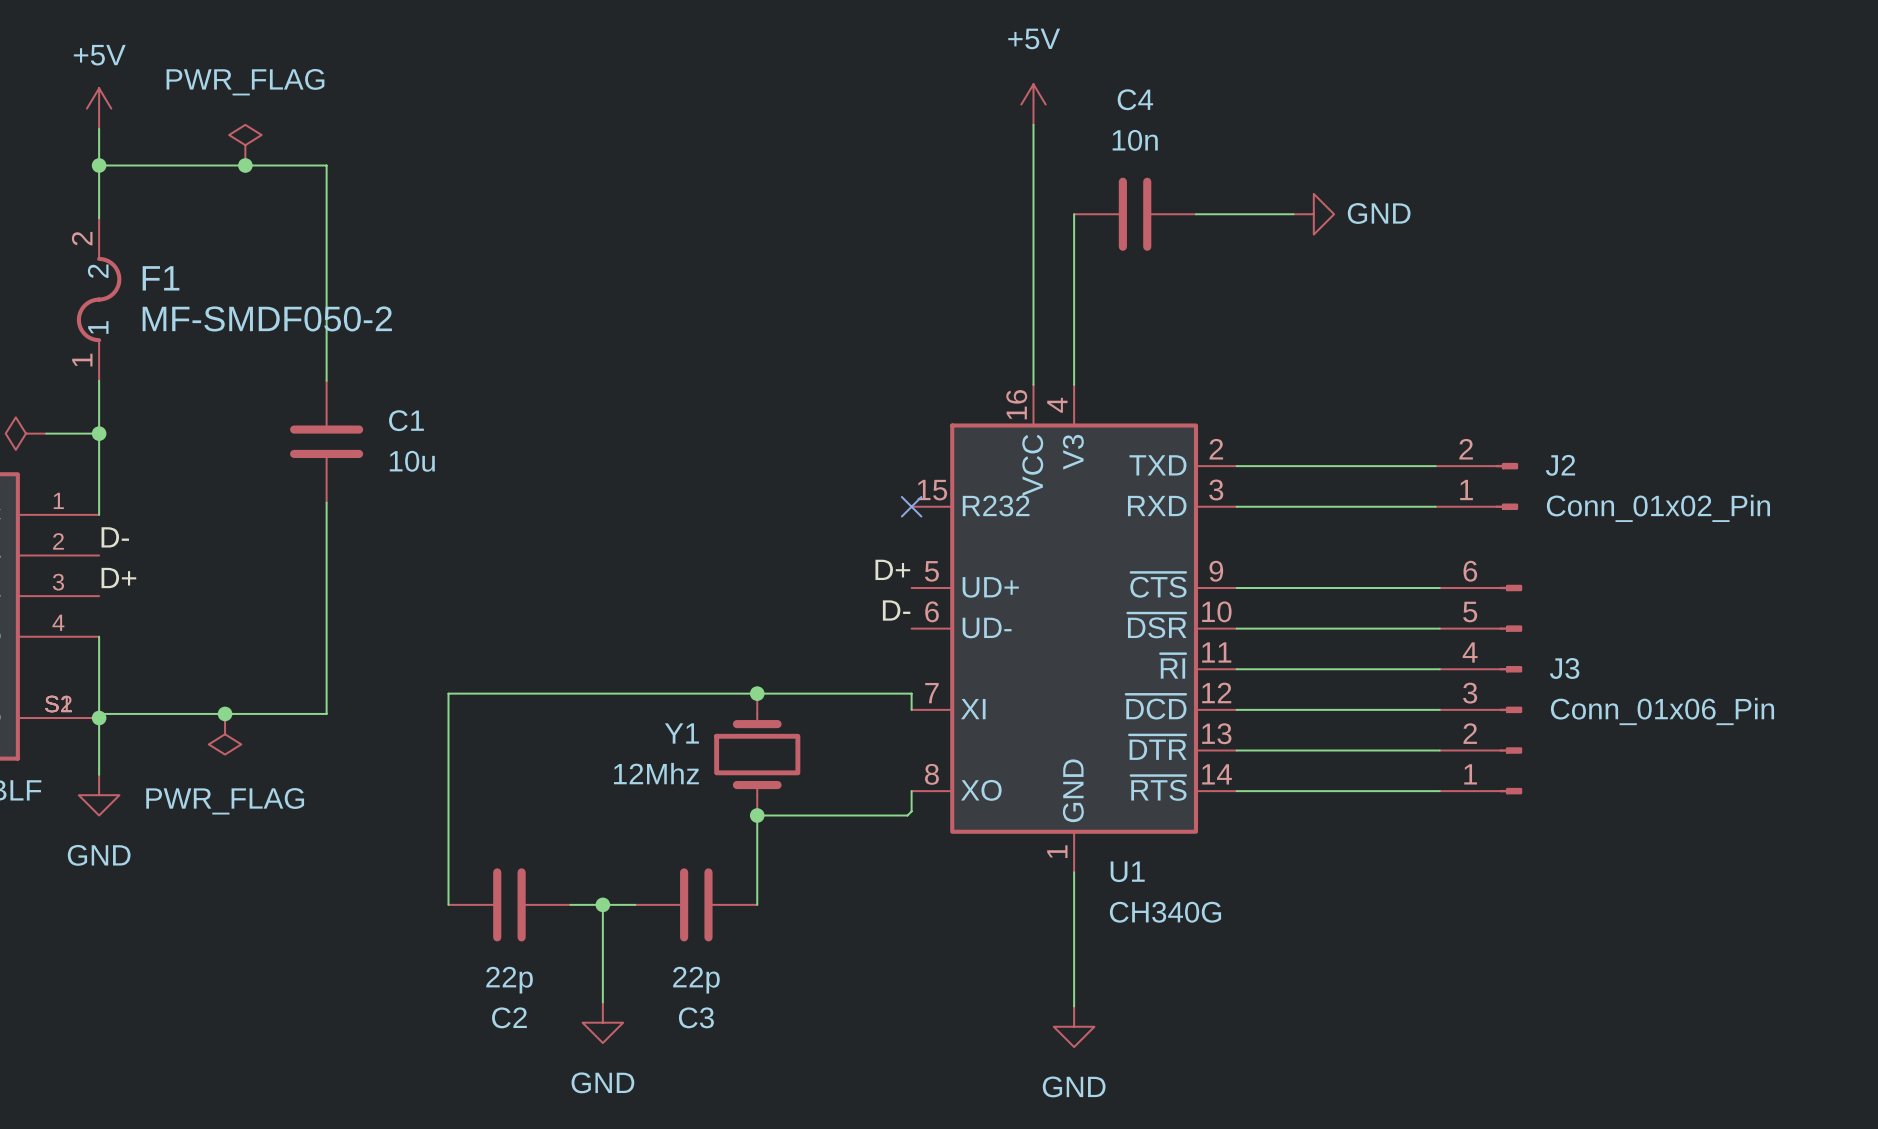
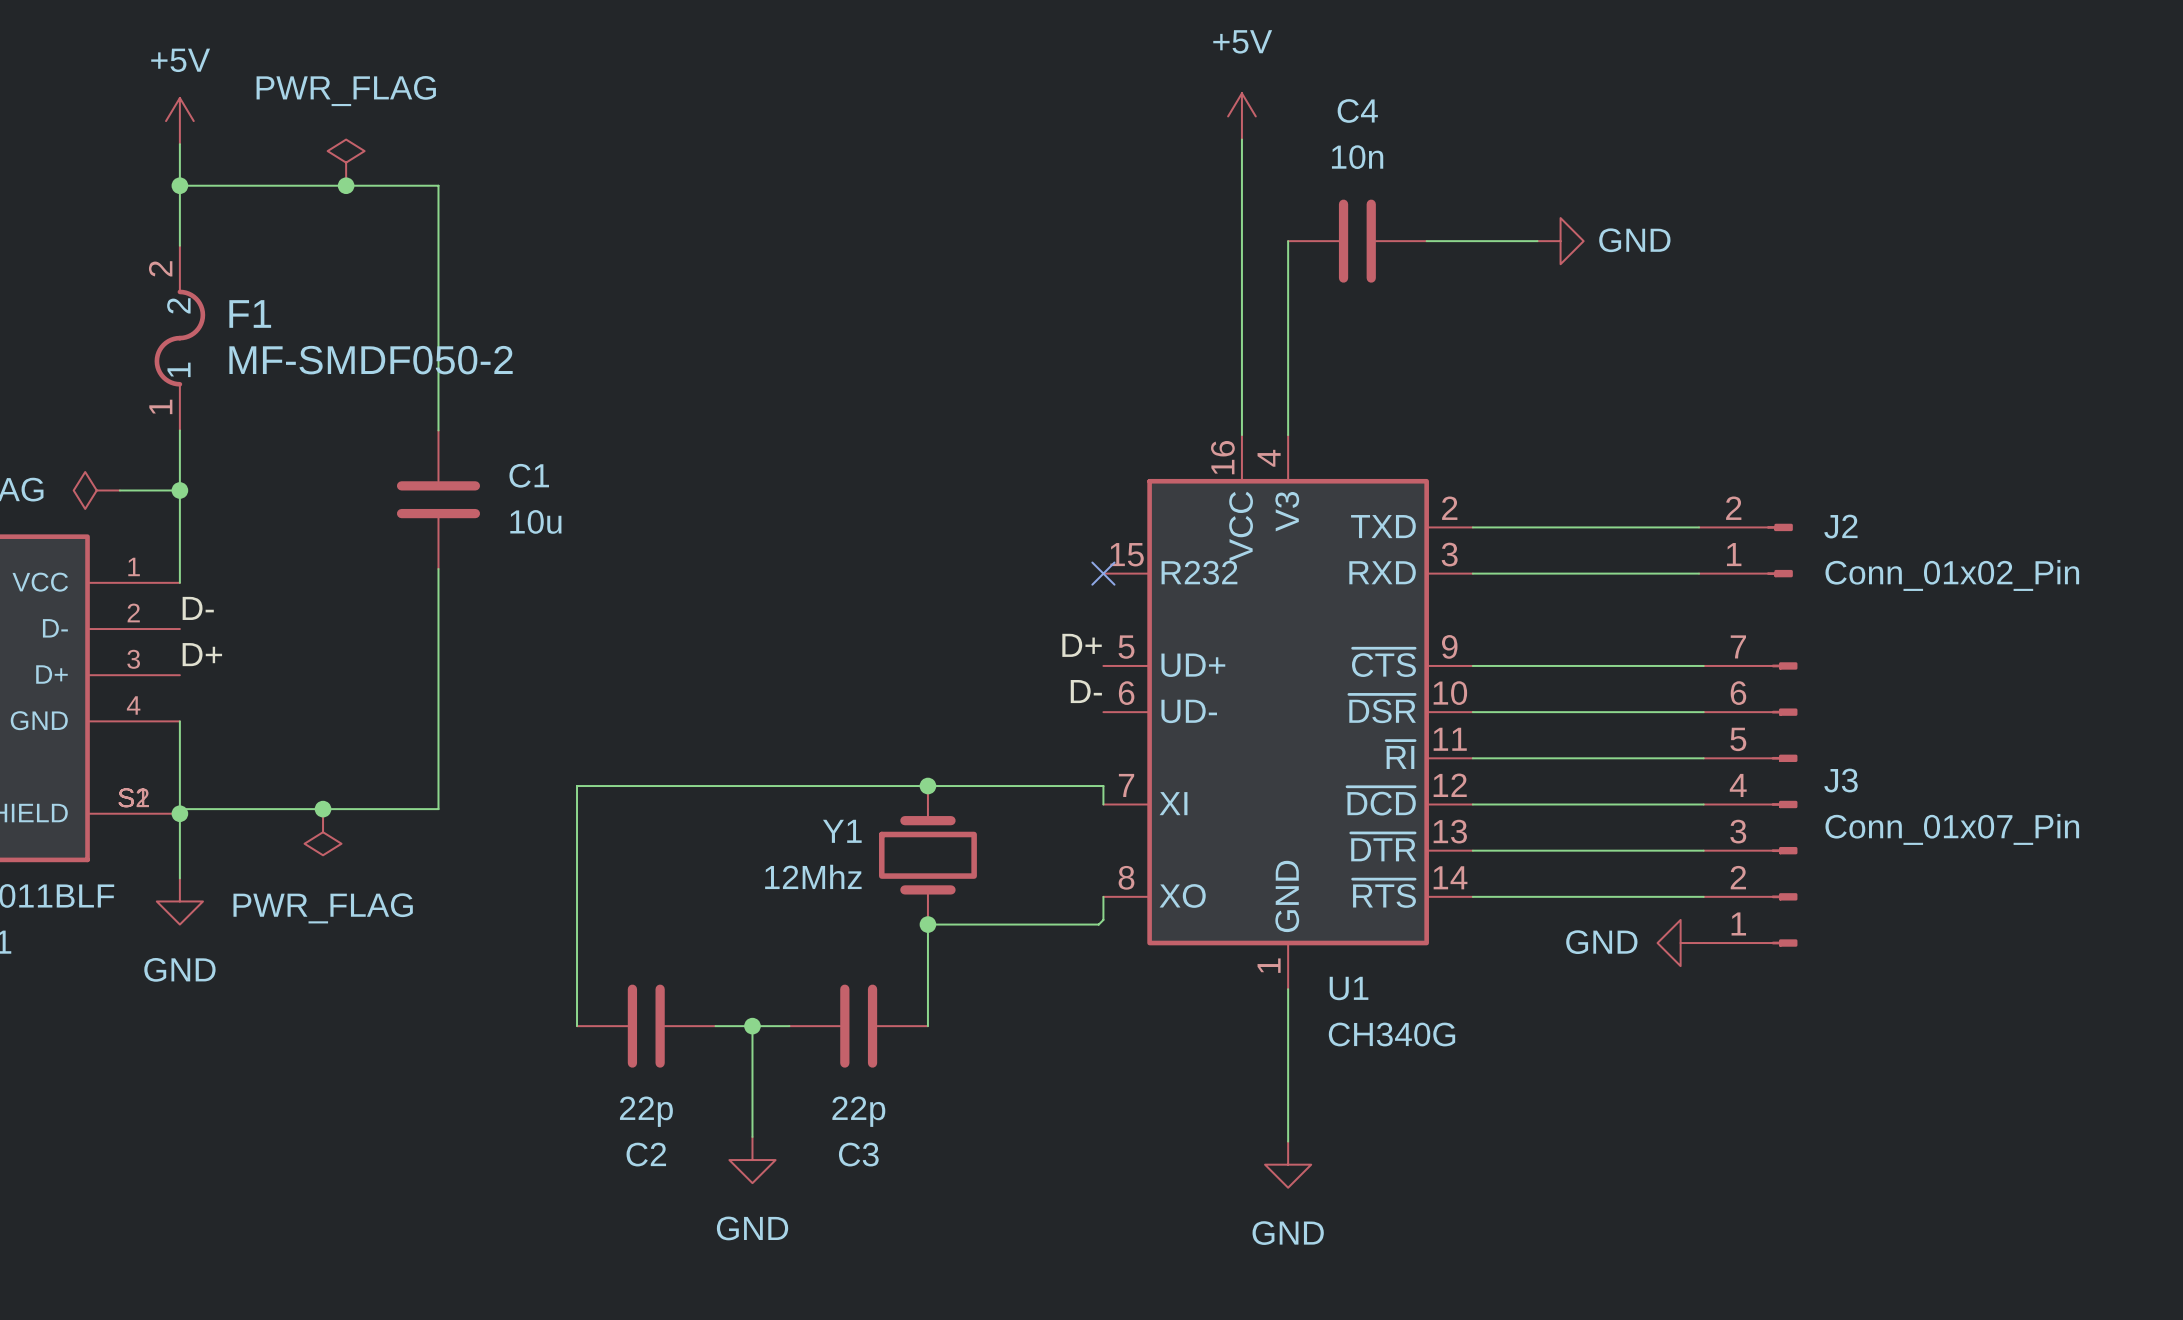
J3 symbol: [1439, 584, 1523, 795] -> [1703, 662, 1798, 947]
J3 value: Conn_01x06_Pin (1662, 711) -> Conn_01x07_Pin (1952, 829)
power symbol: none -> GND (1680, 943)

